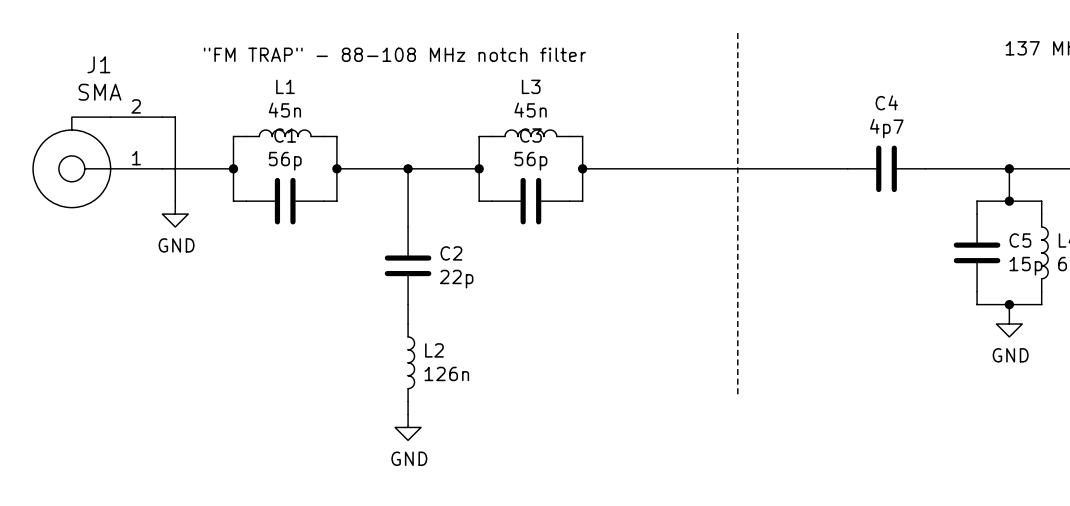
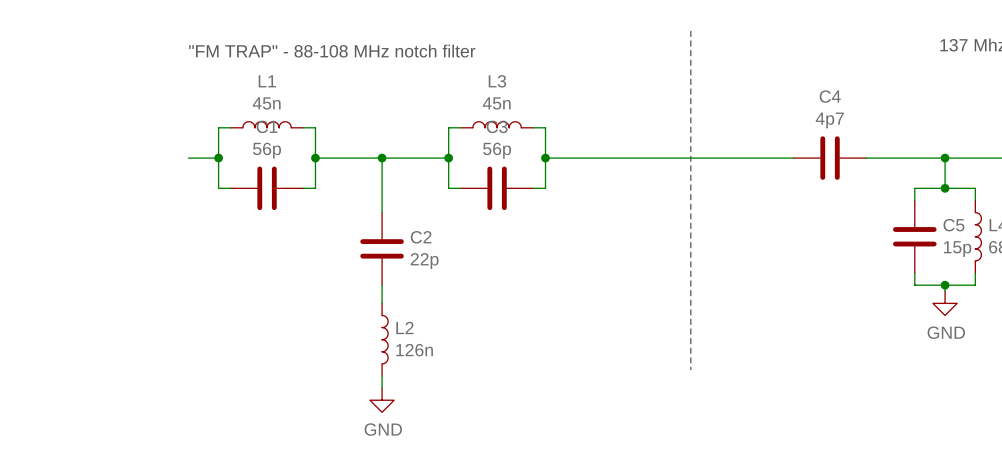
wire: (162, 117) (175, 117) (175, 201) -> none
J1: SMA (97, 162) -> none
wire: (162, 168) (201, 168) -> none
power symbol: GND (175, 214) -> none

